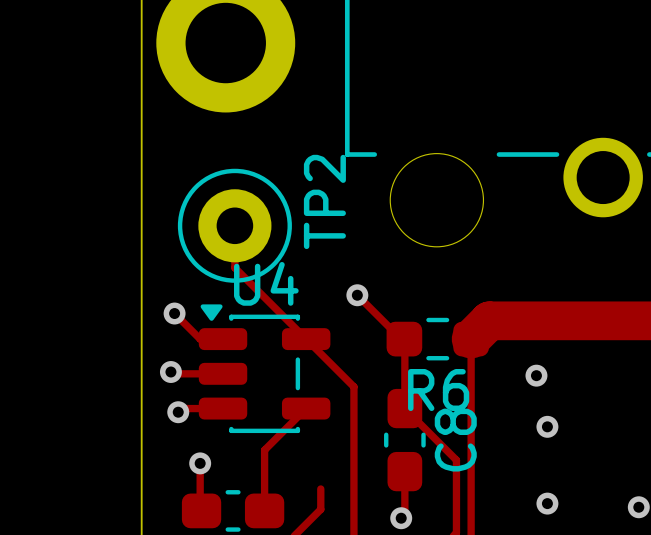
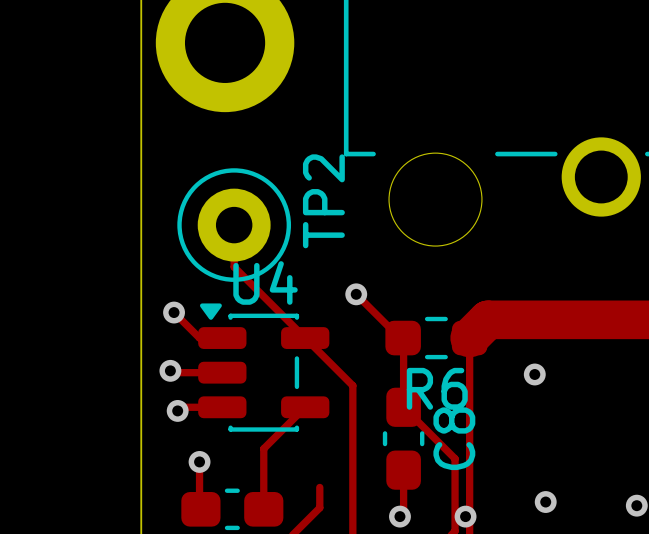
via: (547, 426) -> none
via: none -> (465, 516)

